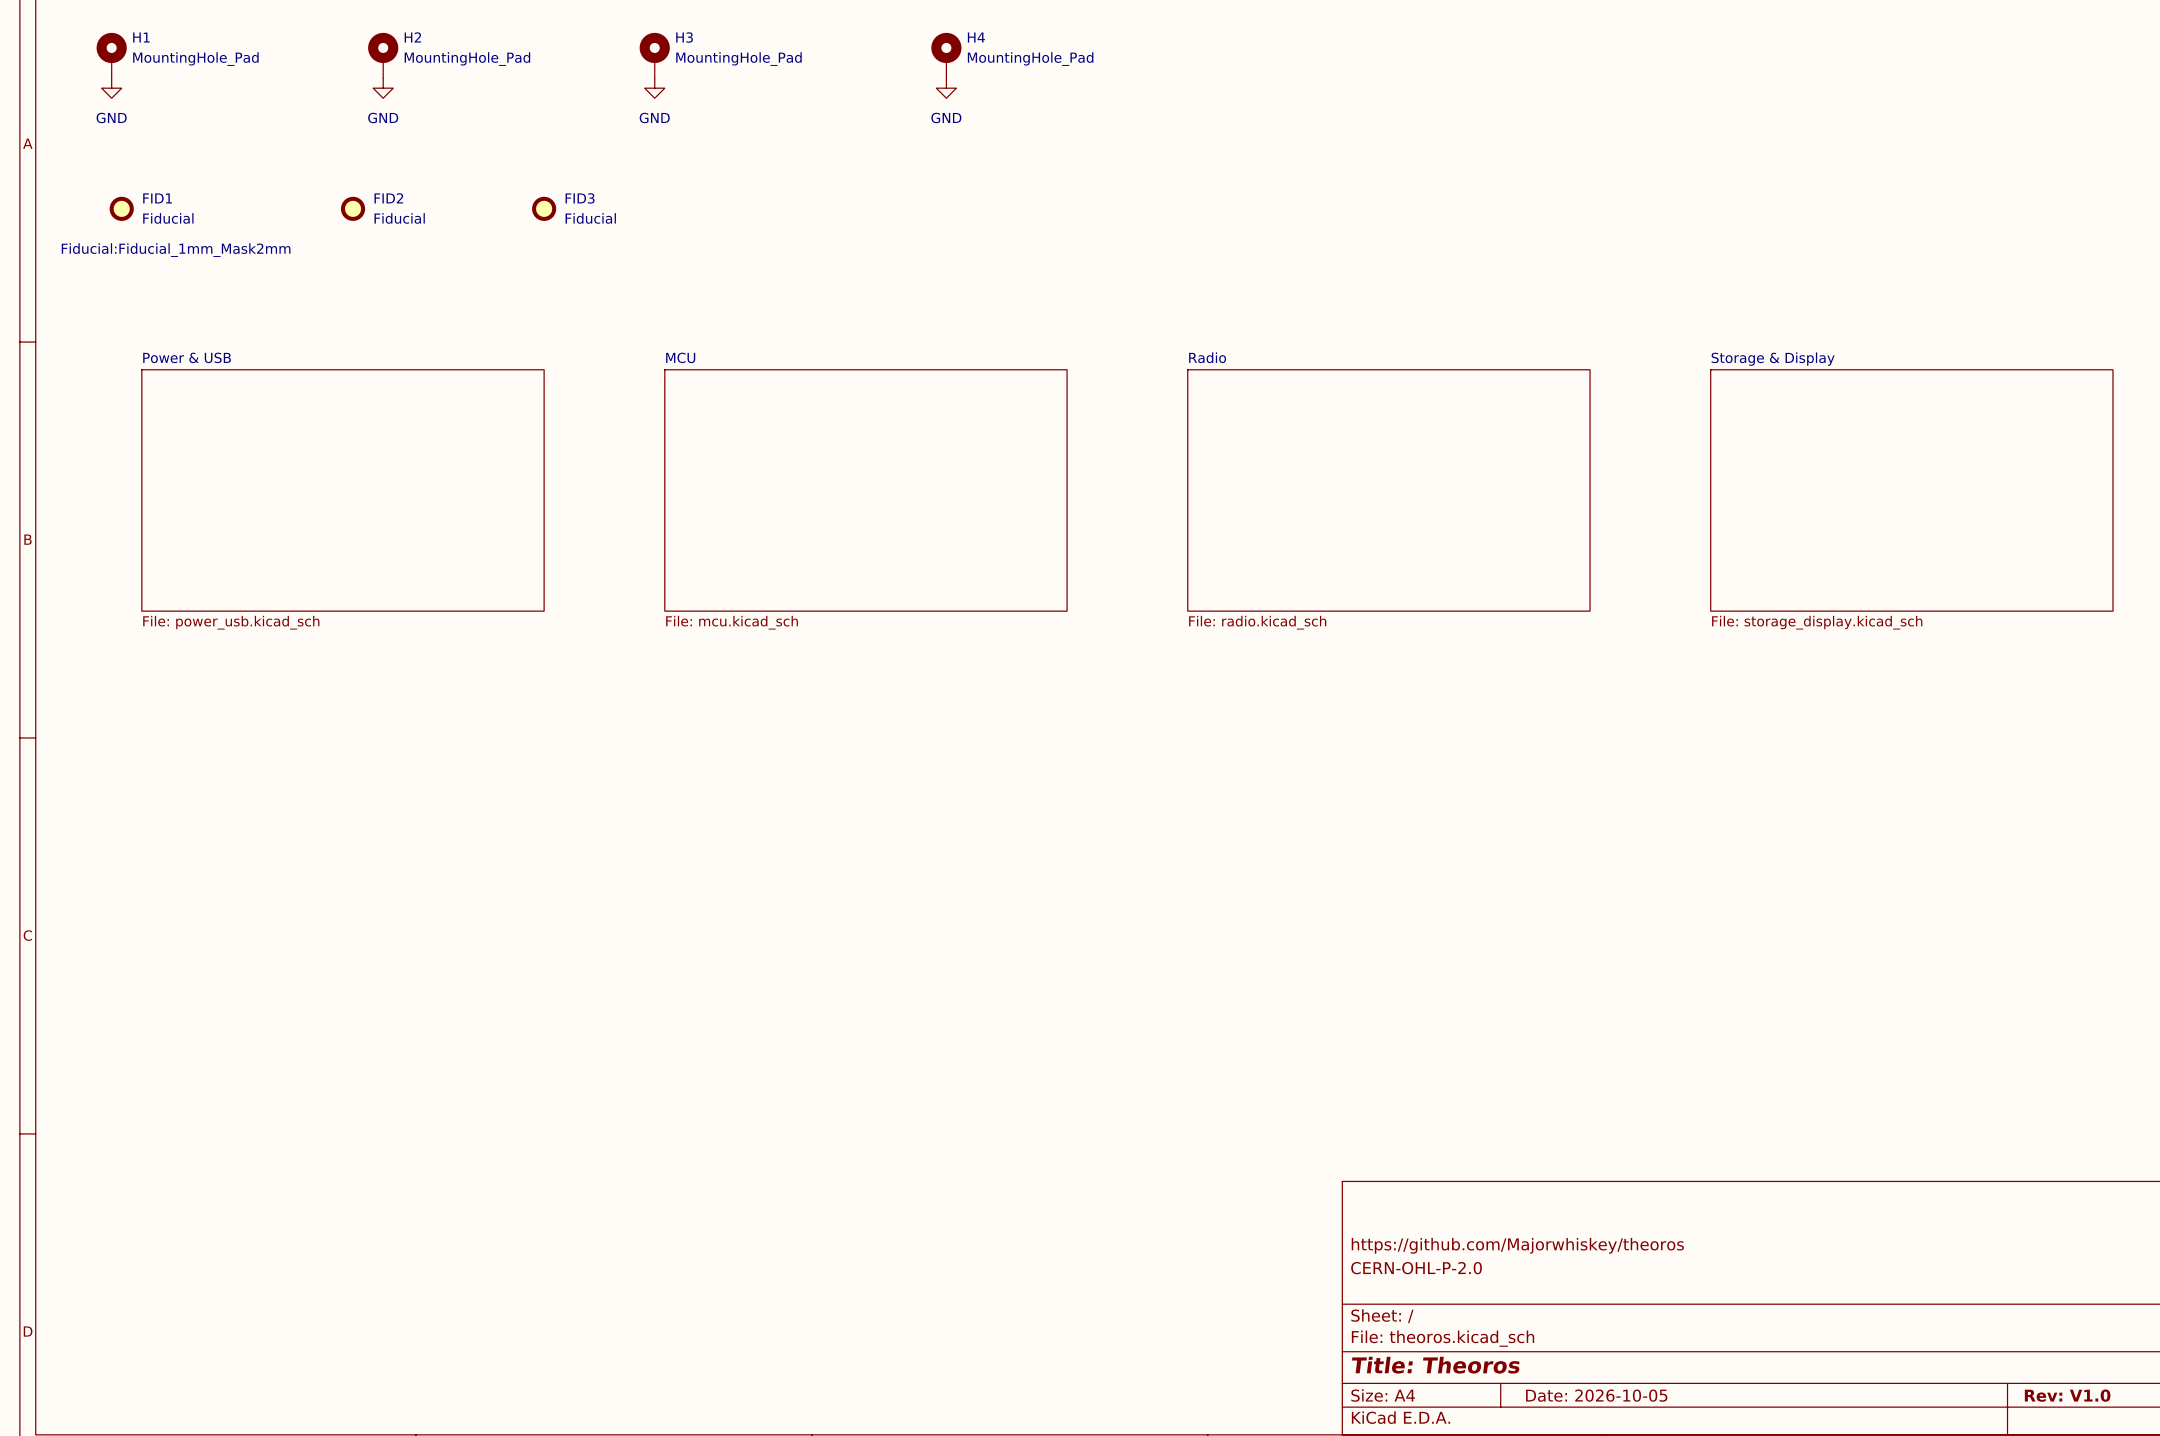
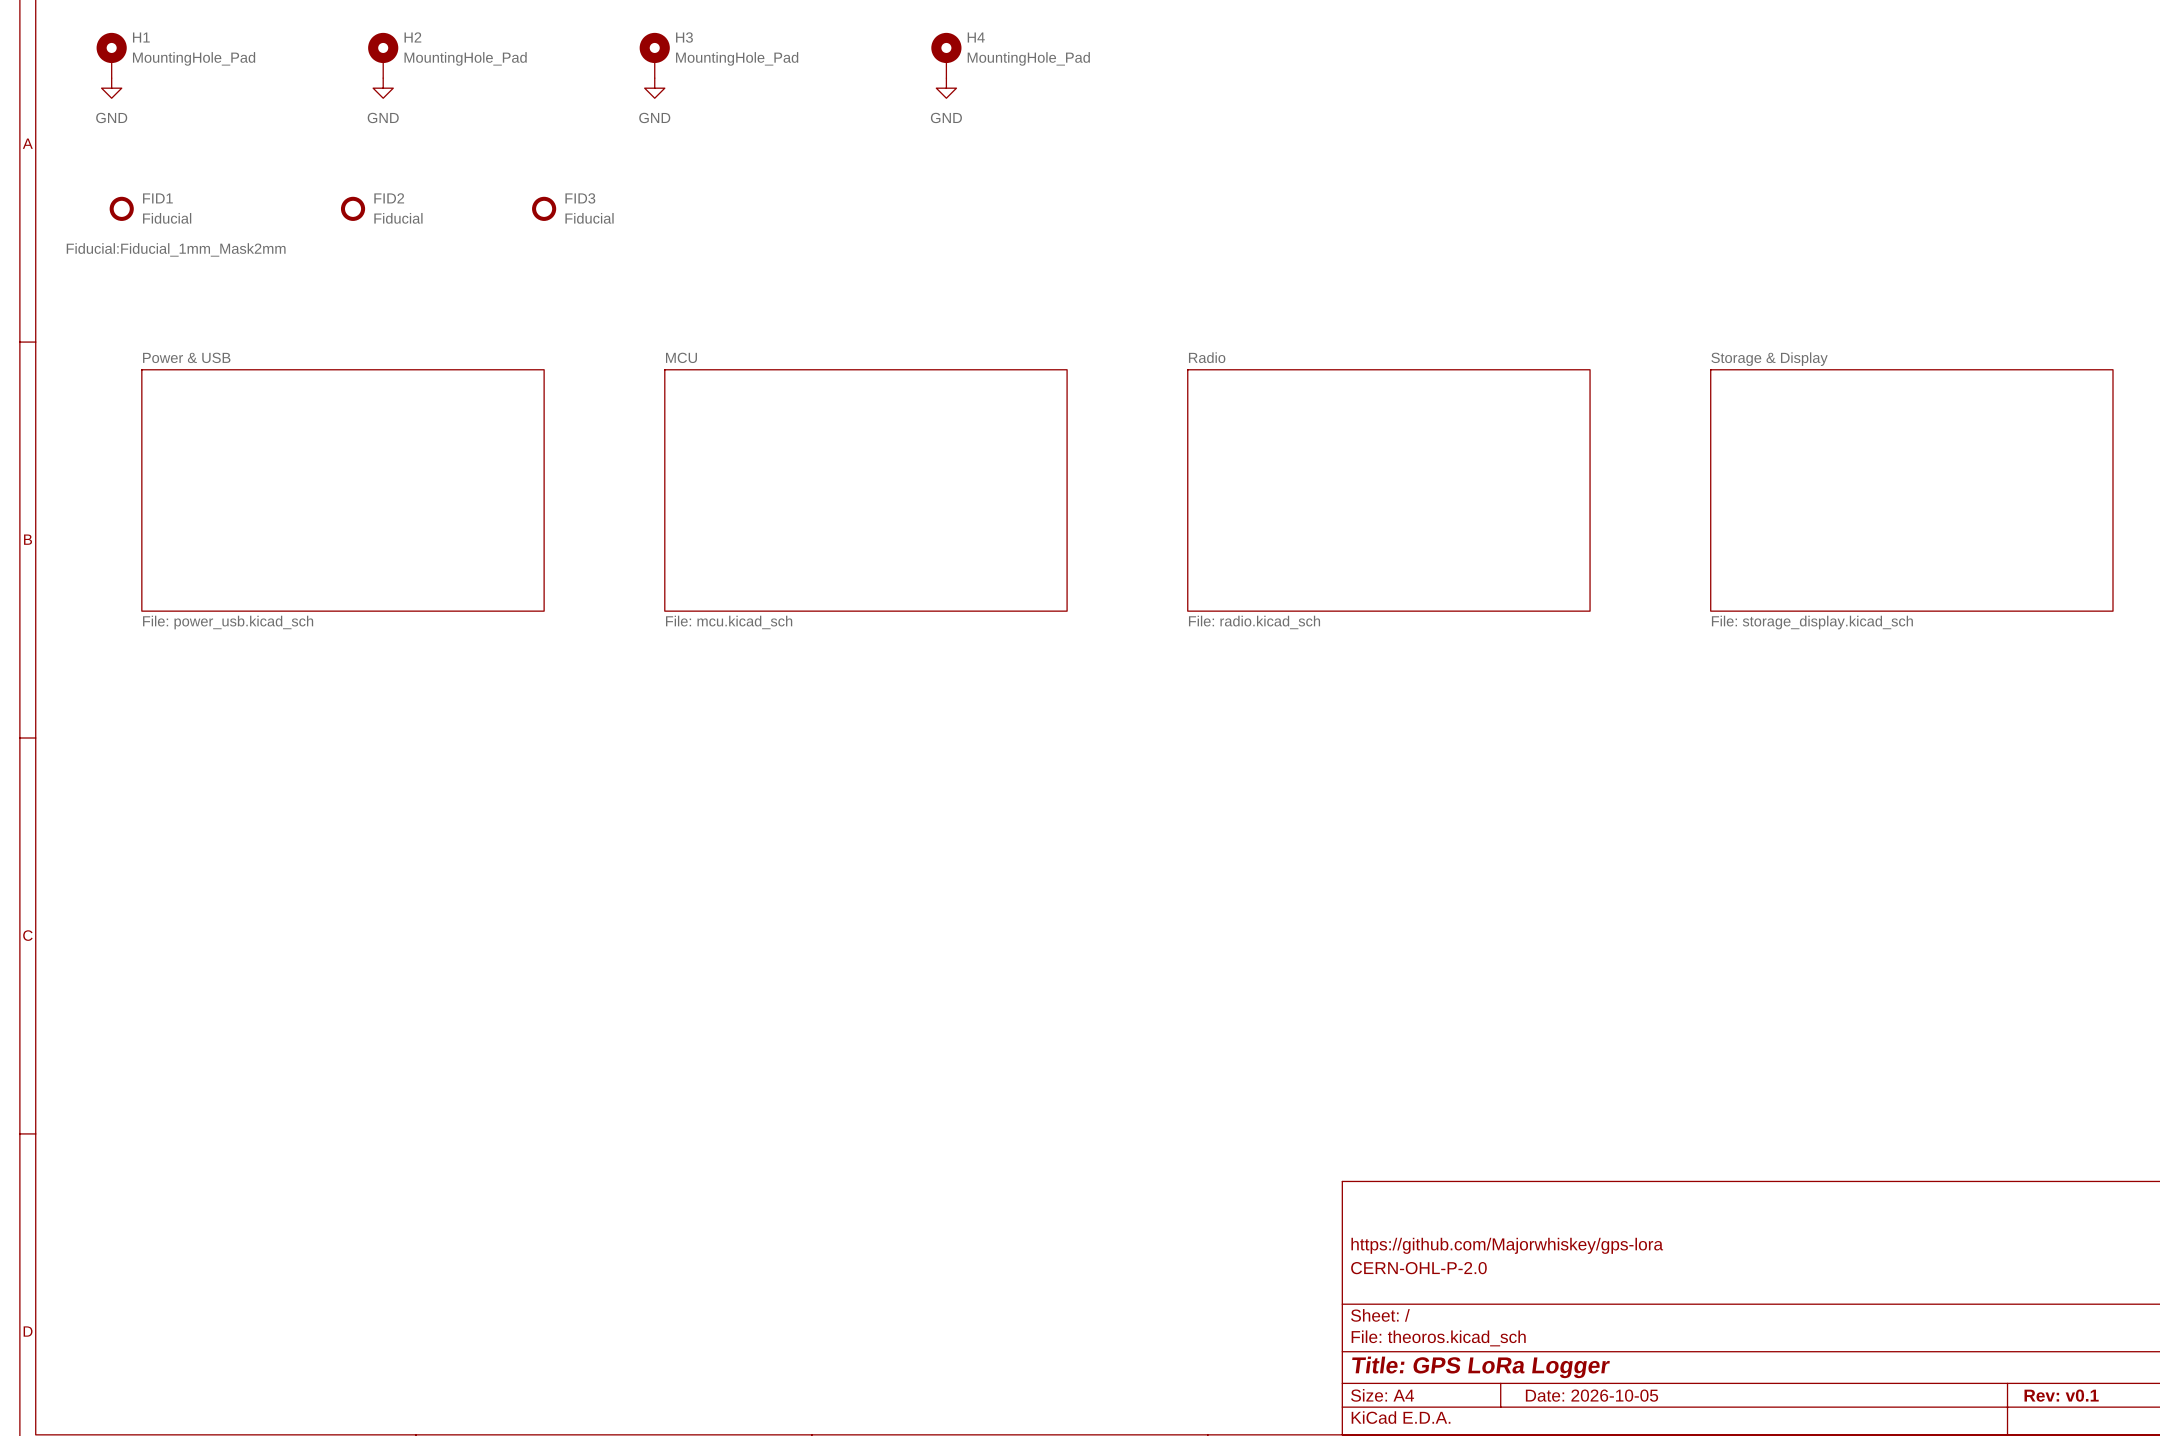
title block: https://github.com/Majorwhiskey/theoros (1517, 1245) -> https://github.com/Majorwhiskey/gps-lora (1507, 1245)
title block: Title: Theoros (1435, 1365) -> Title: GPS LoRa Logger (1480, 1367)
title block: Rev: V1.0 (2067, 1395) -> Rev: v0.1 (2061, 1395)

